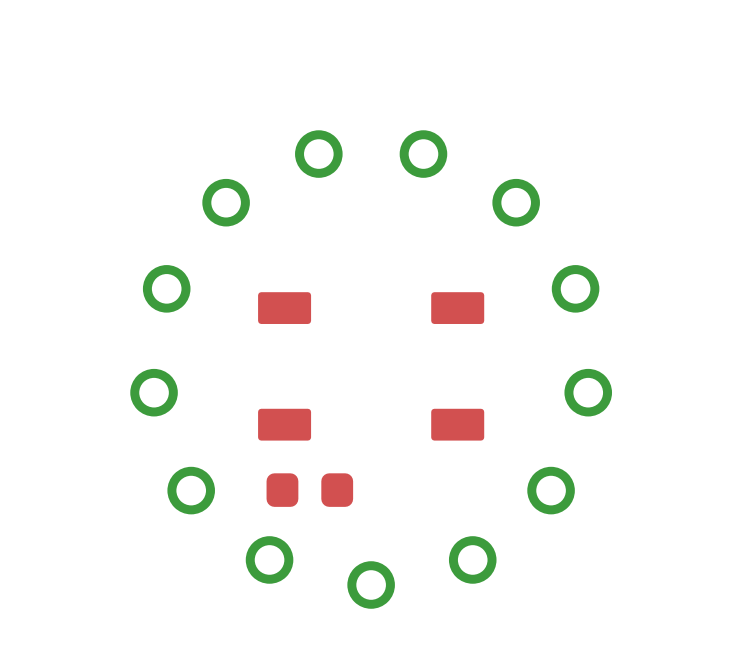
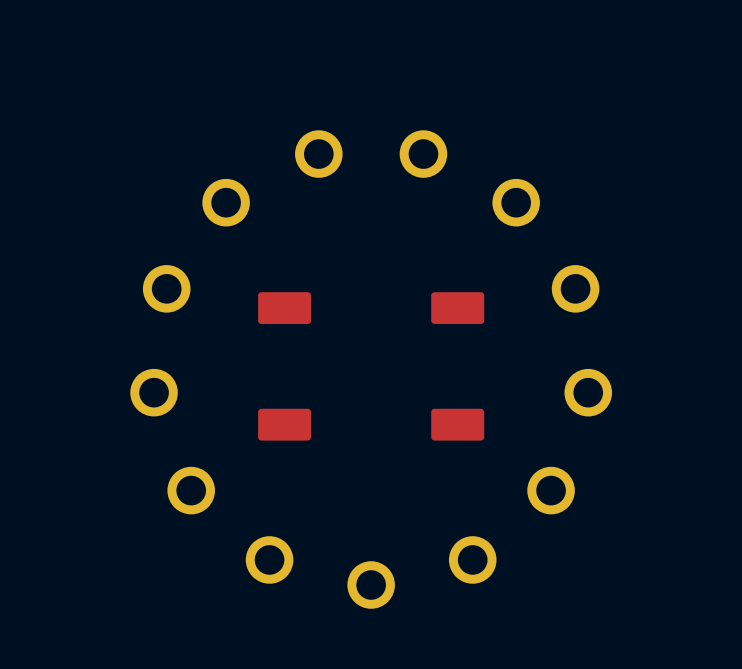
part: (309, 490) -> none

